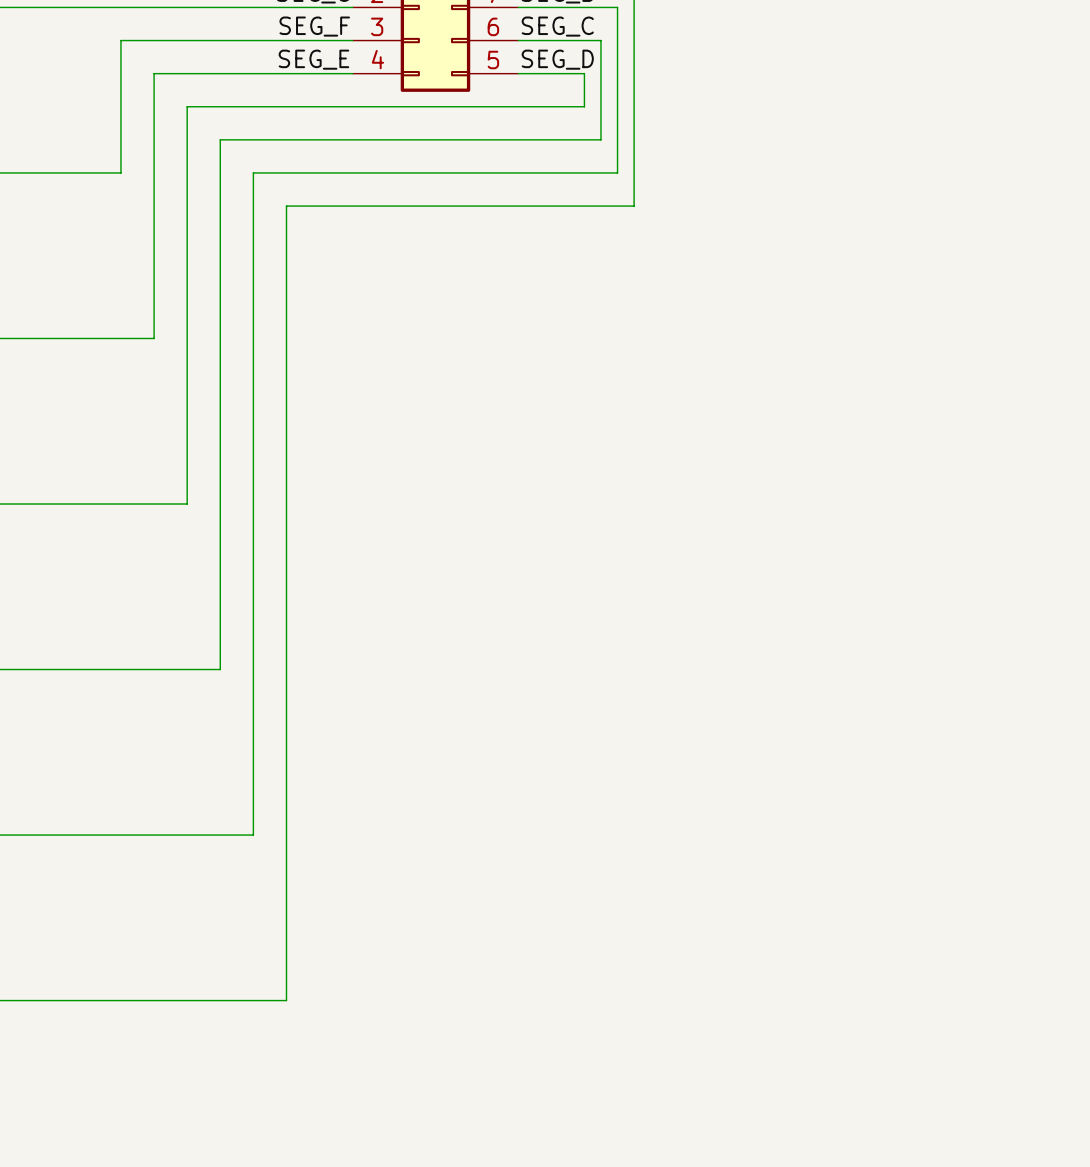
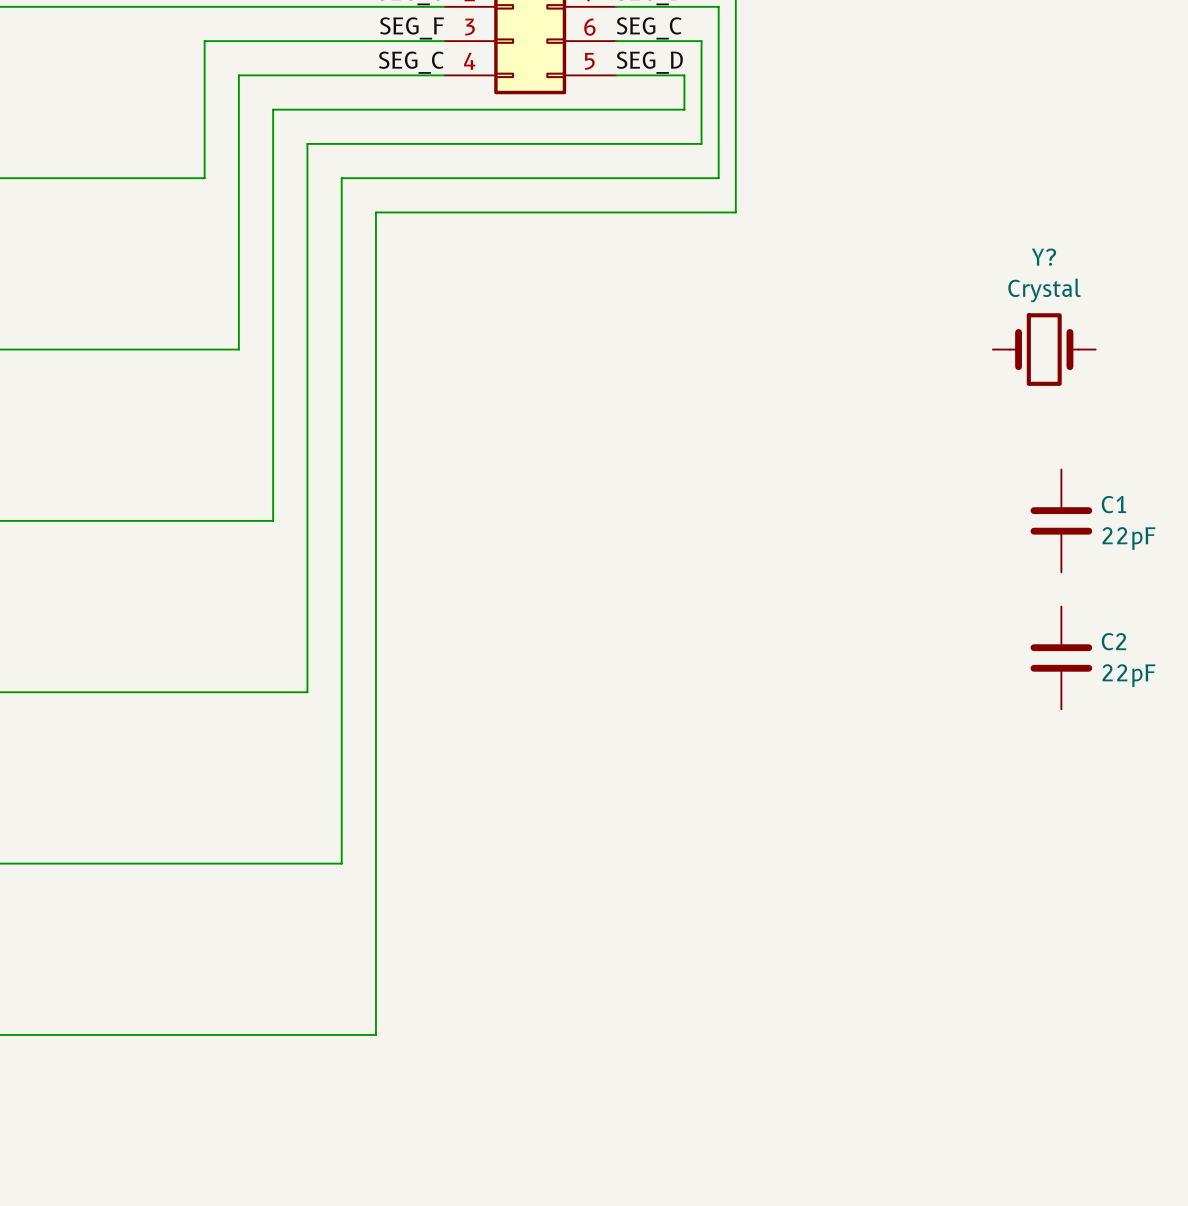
label: SEG_E (313, 59) -> SEG_C (411, 62)
Y?: none -> Crystal (1044, 349)
C1: none -> 22pF (1061, 520)
C2: none -> 22pF (1061, 657)

